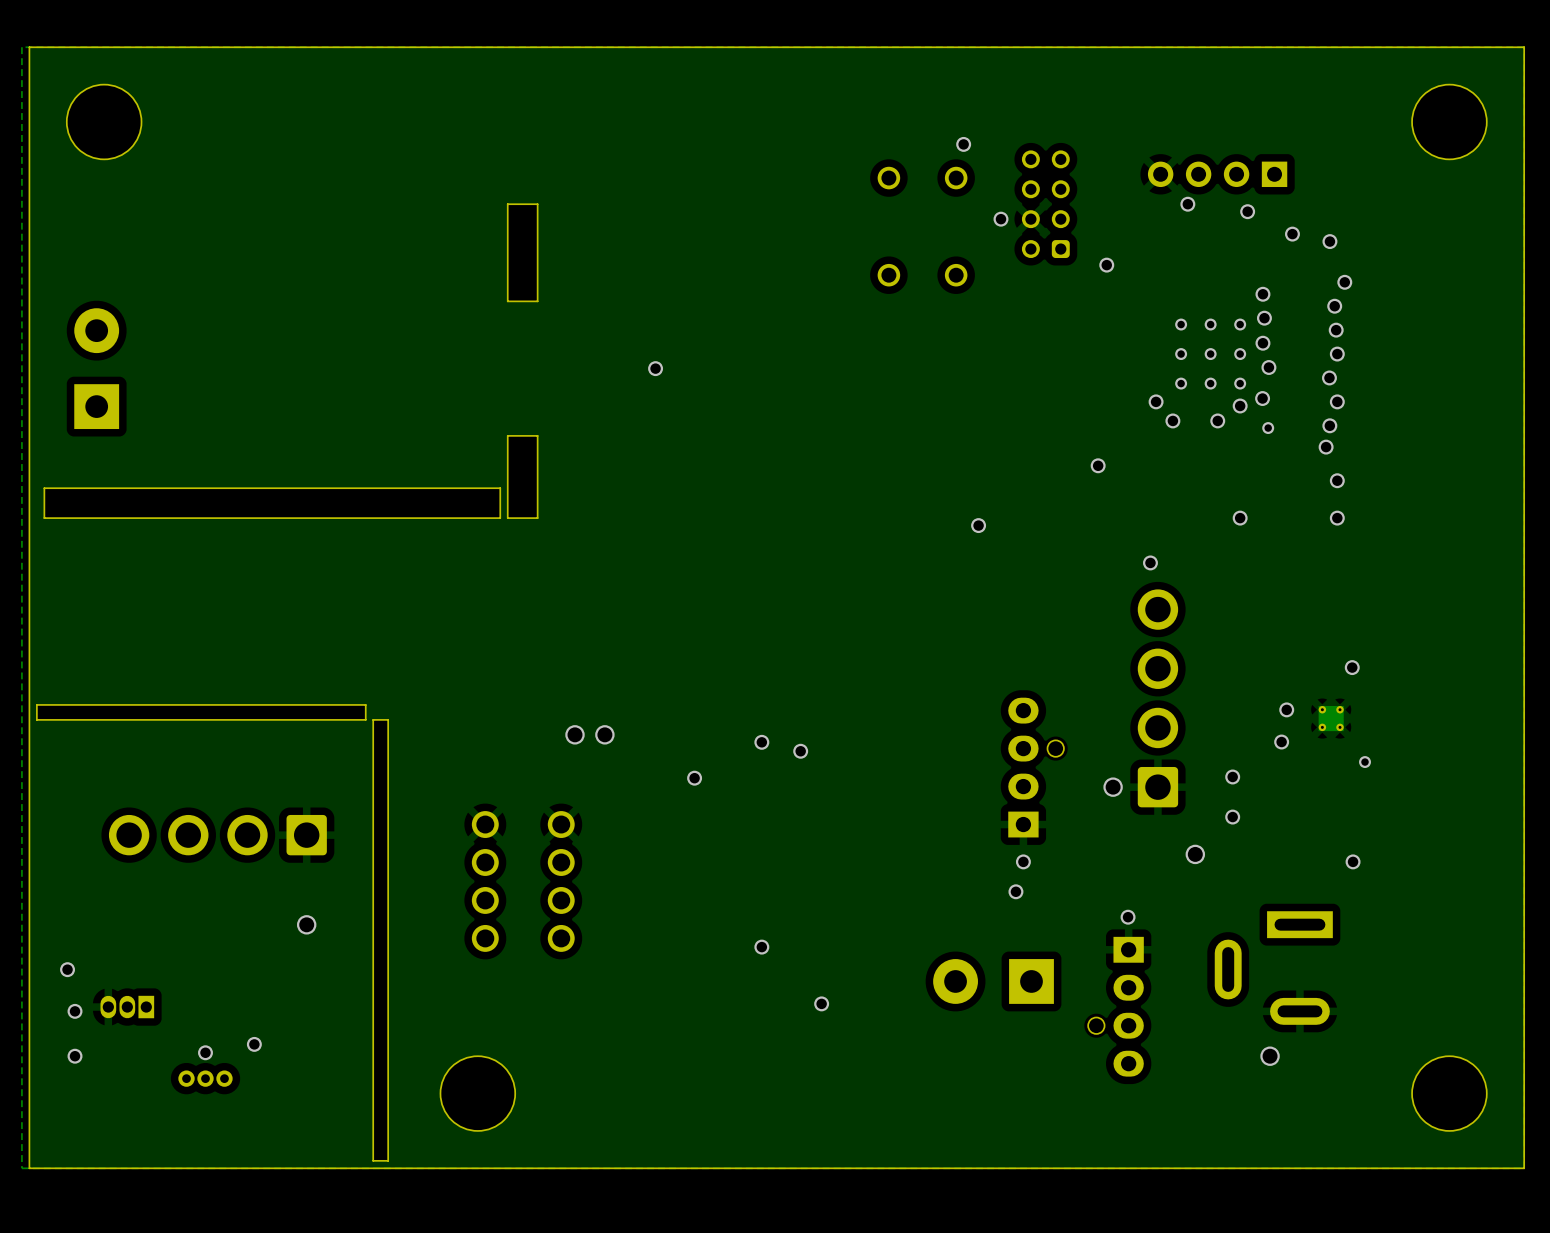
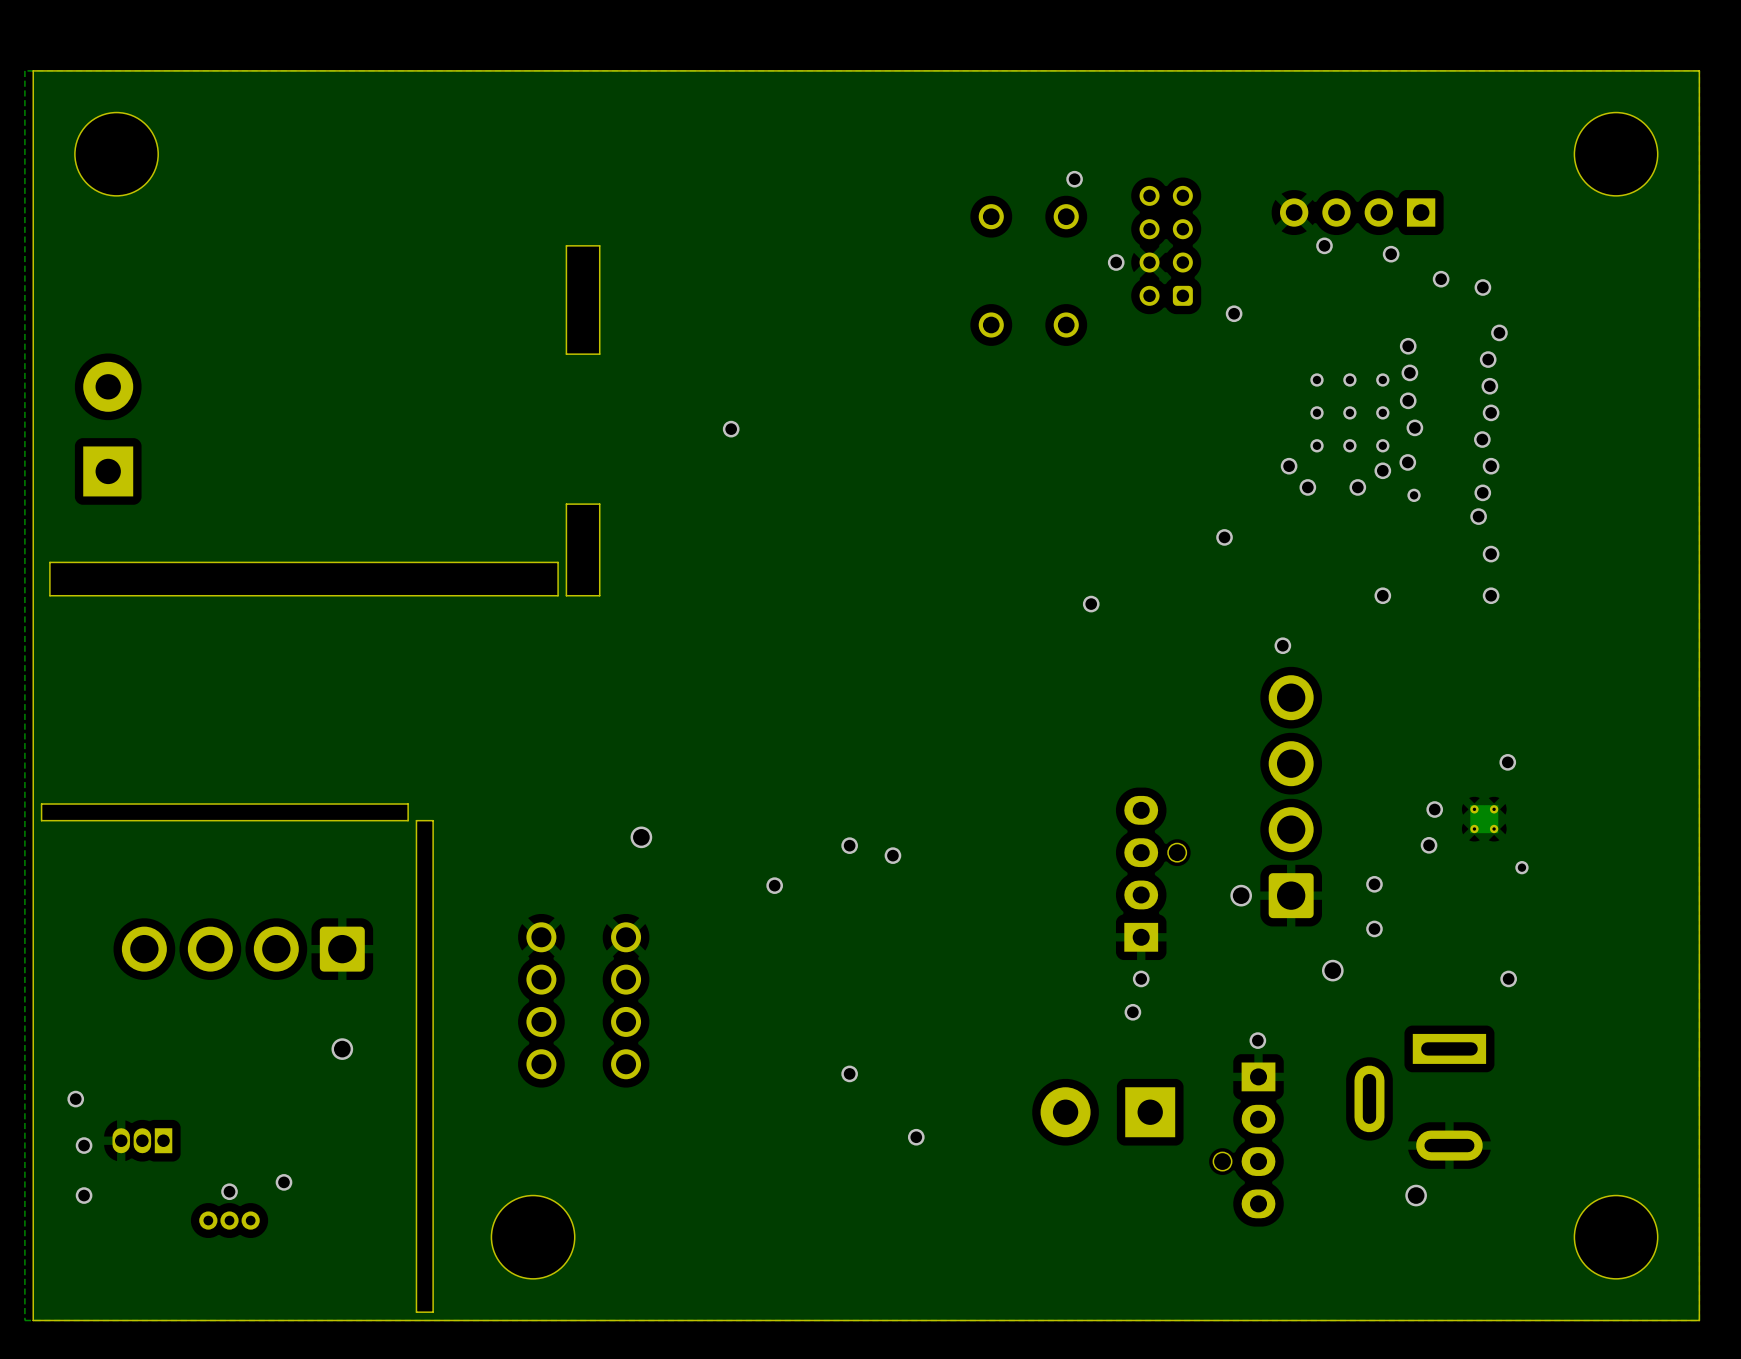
via: (604, 734) -> none

